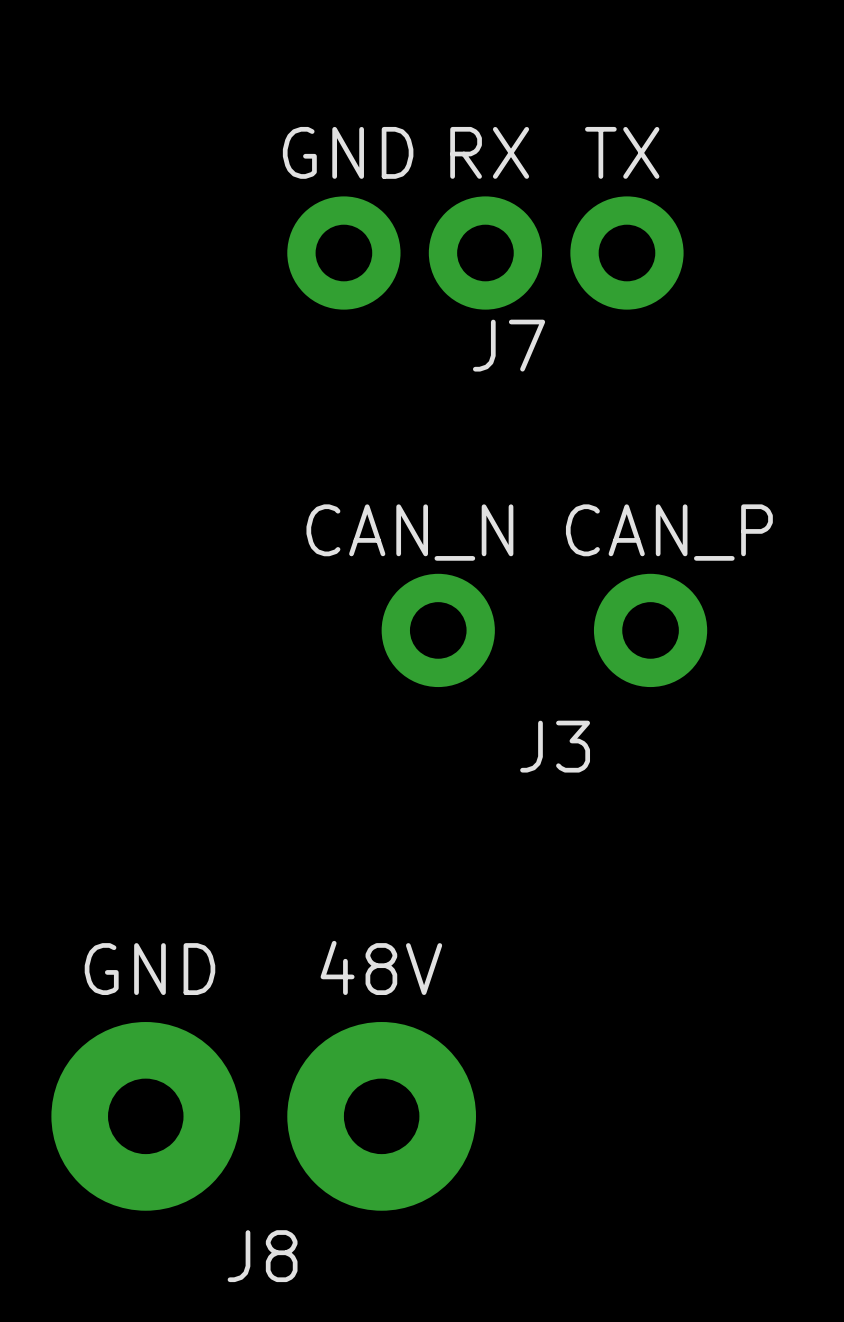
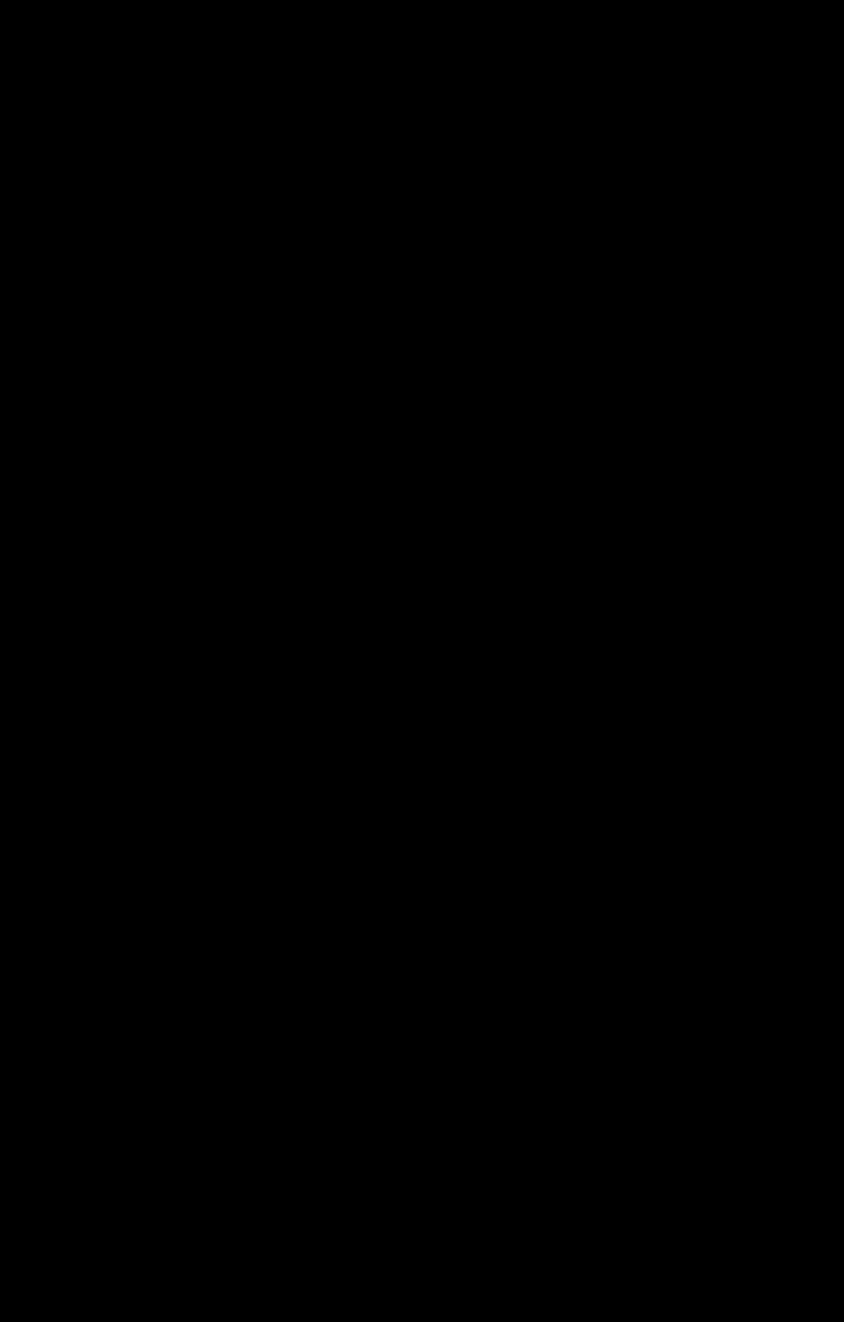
J7: (485, 253) -> none
J3: (544, 630) -> none
J8: (263, 1116) -> none

